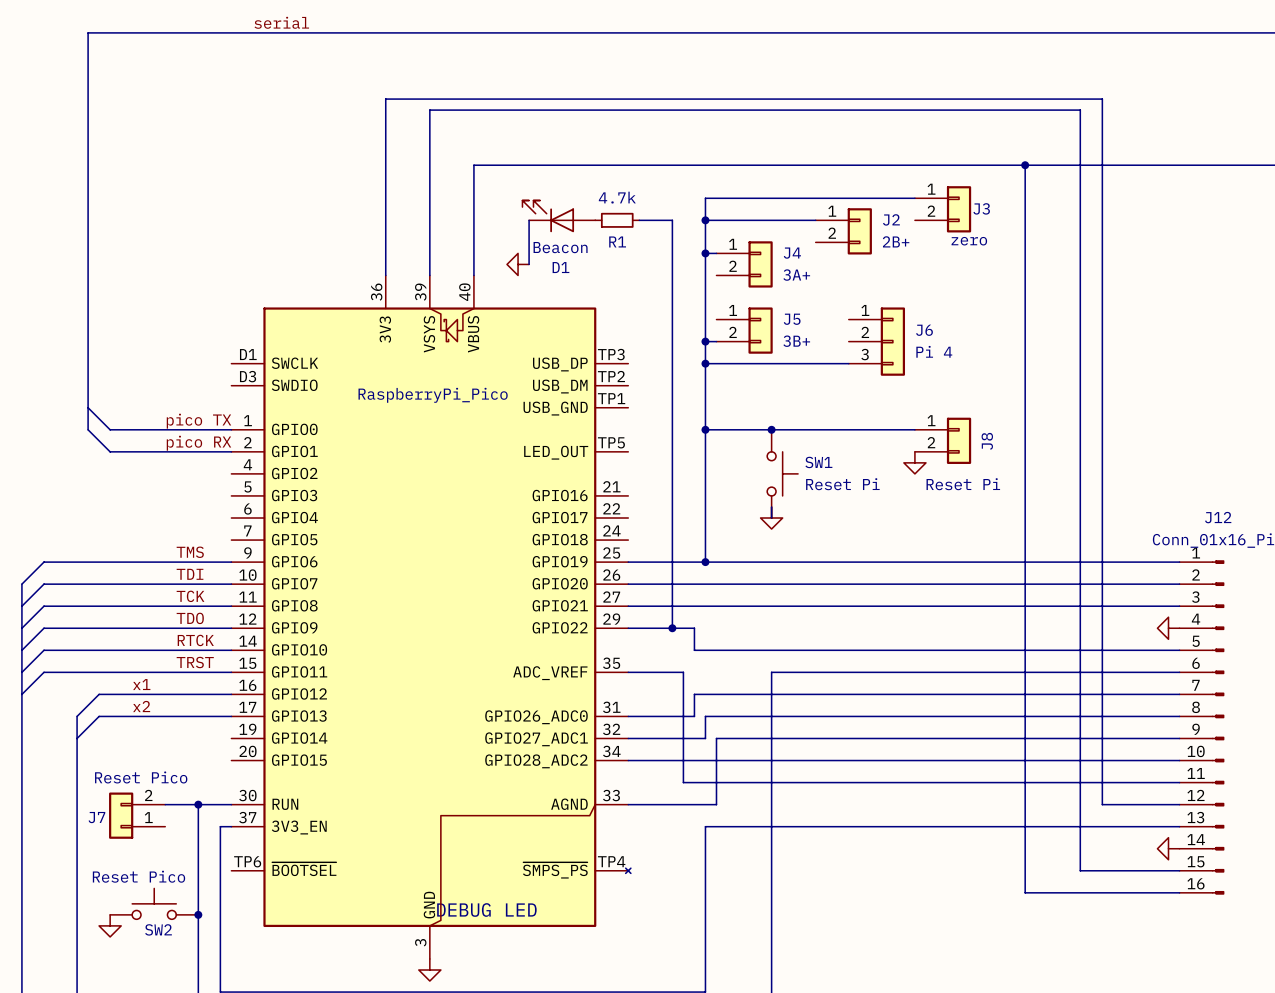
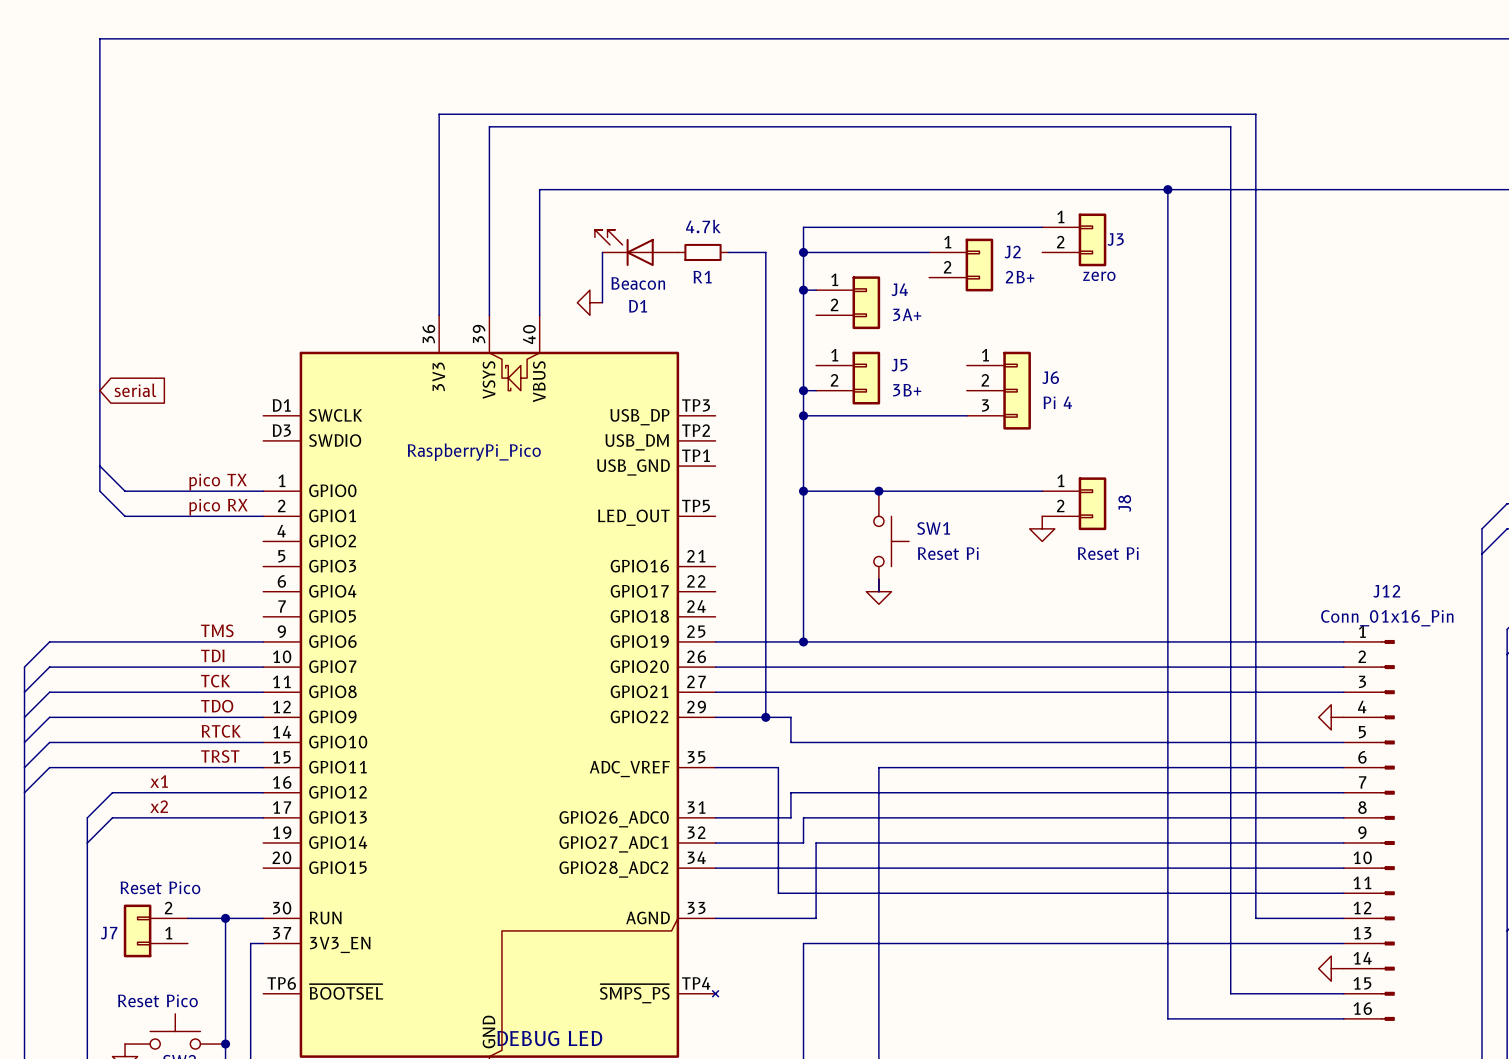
label: serial (281, 22) -> none
global label: none -> serial (135, 390)

